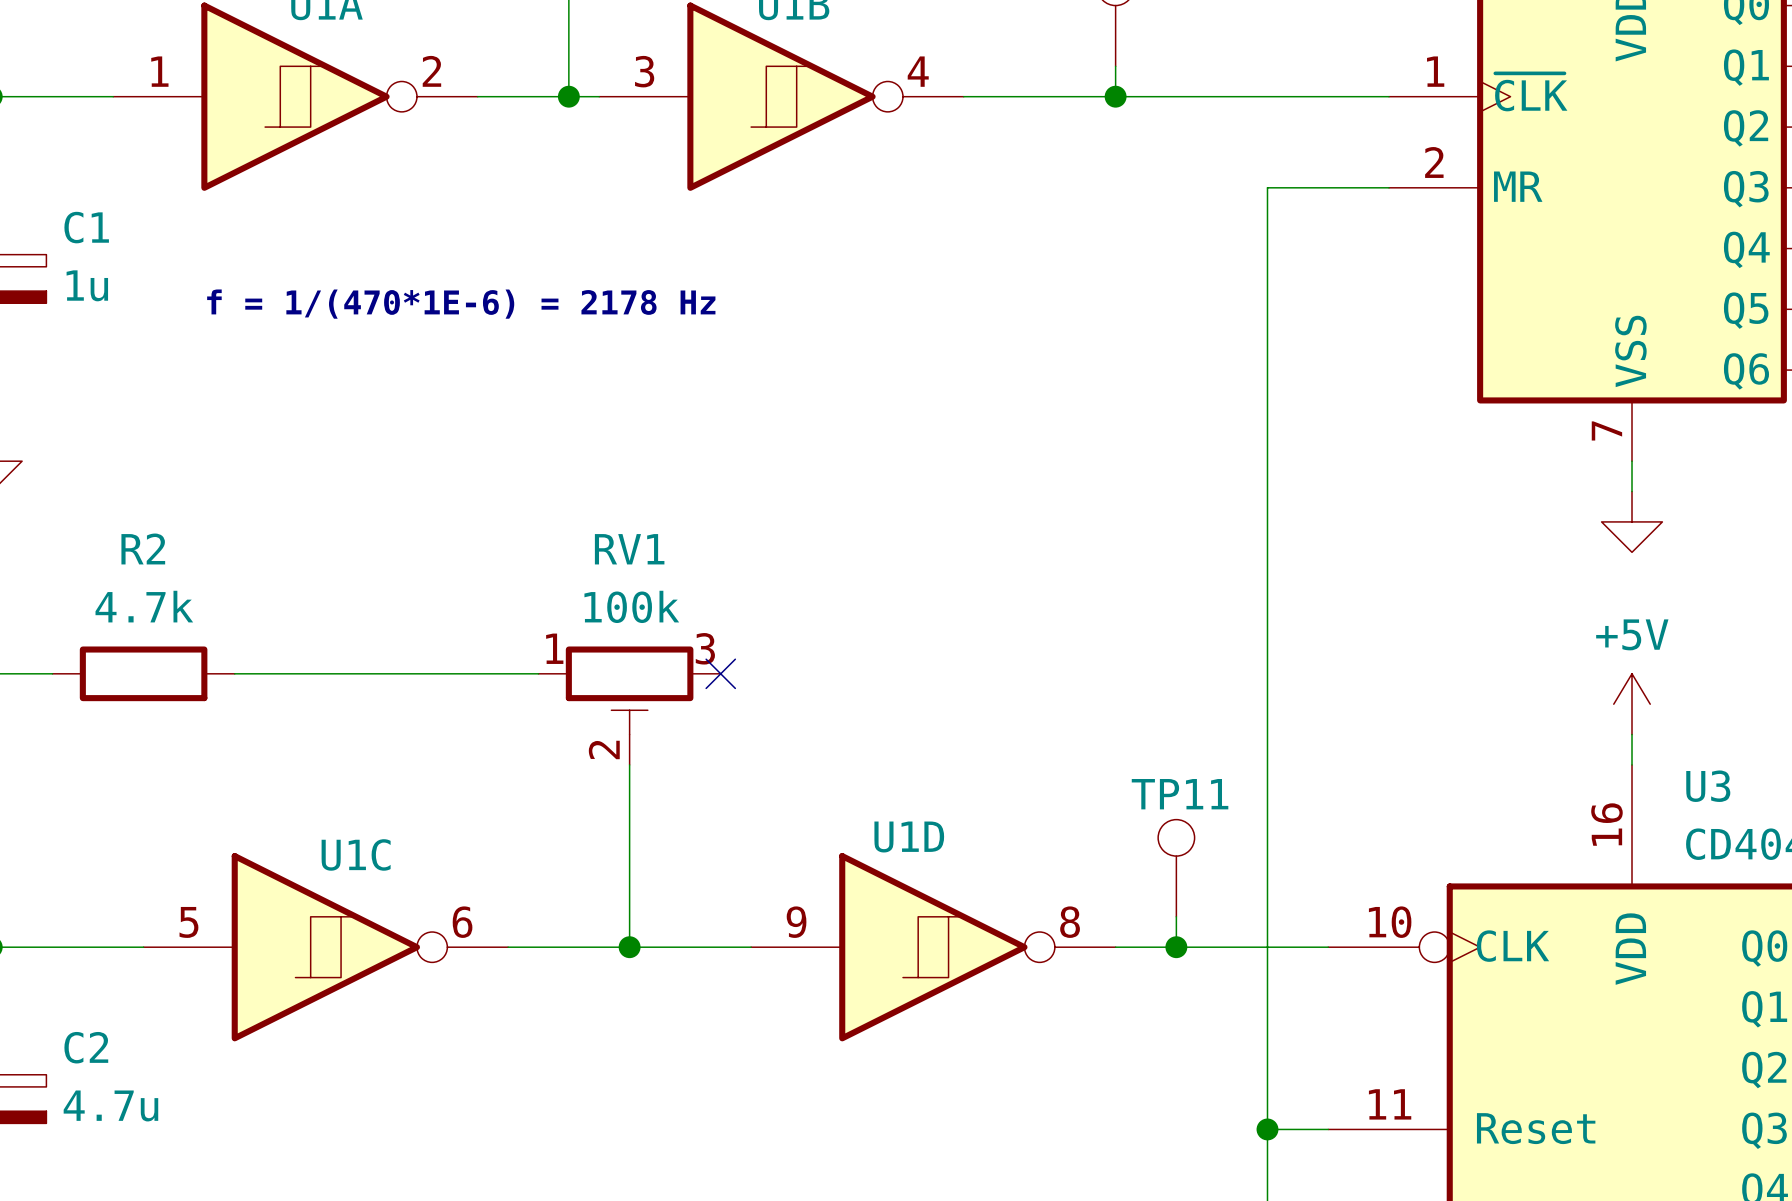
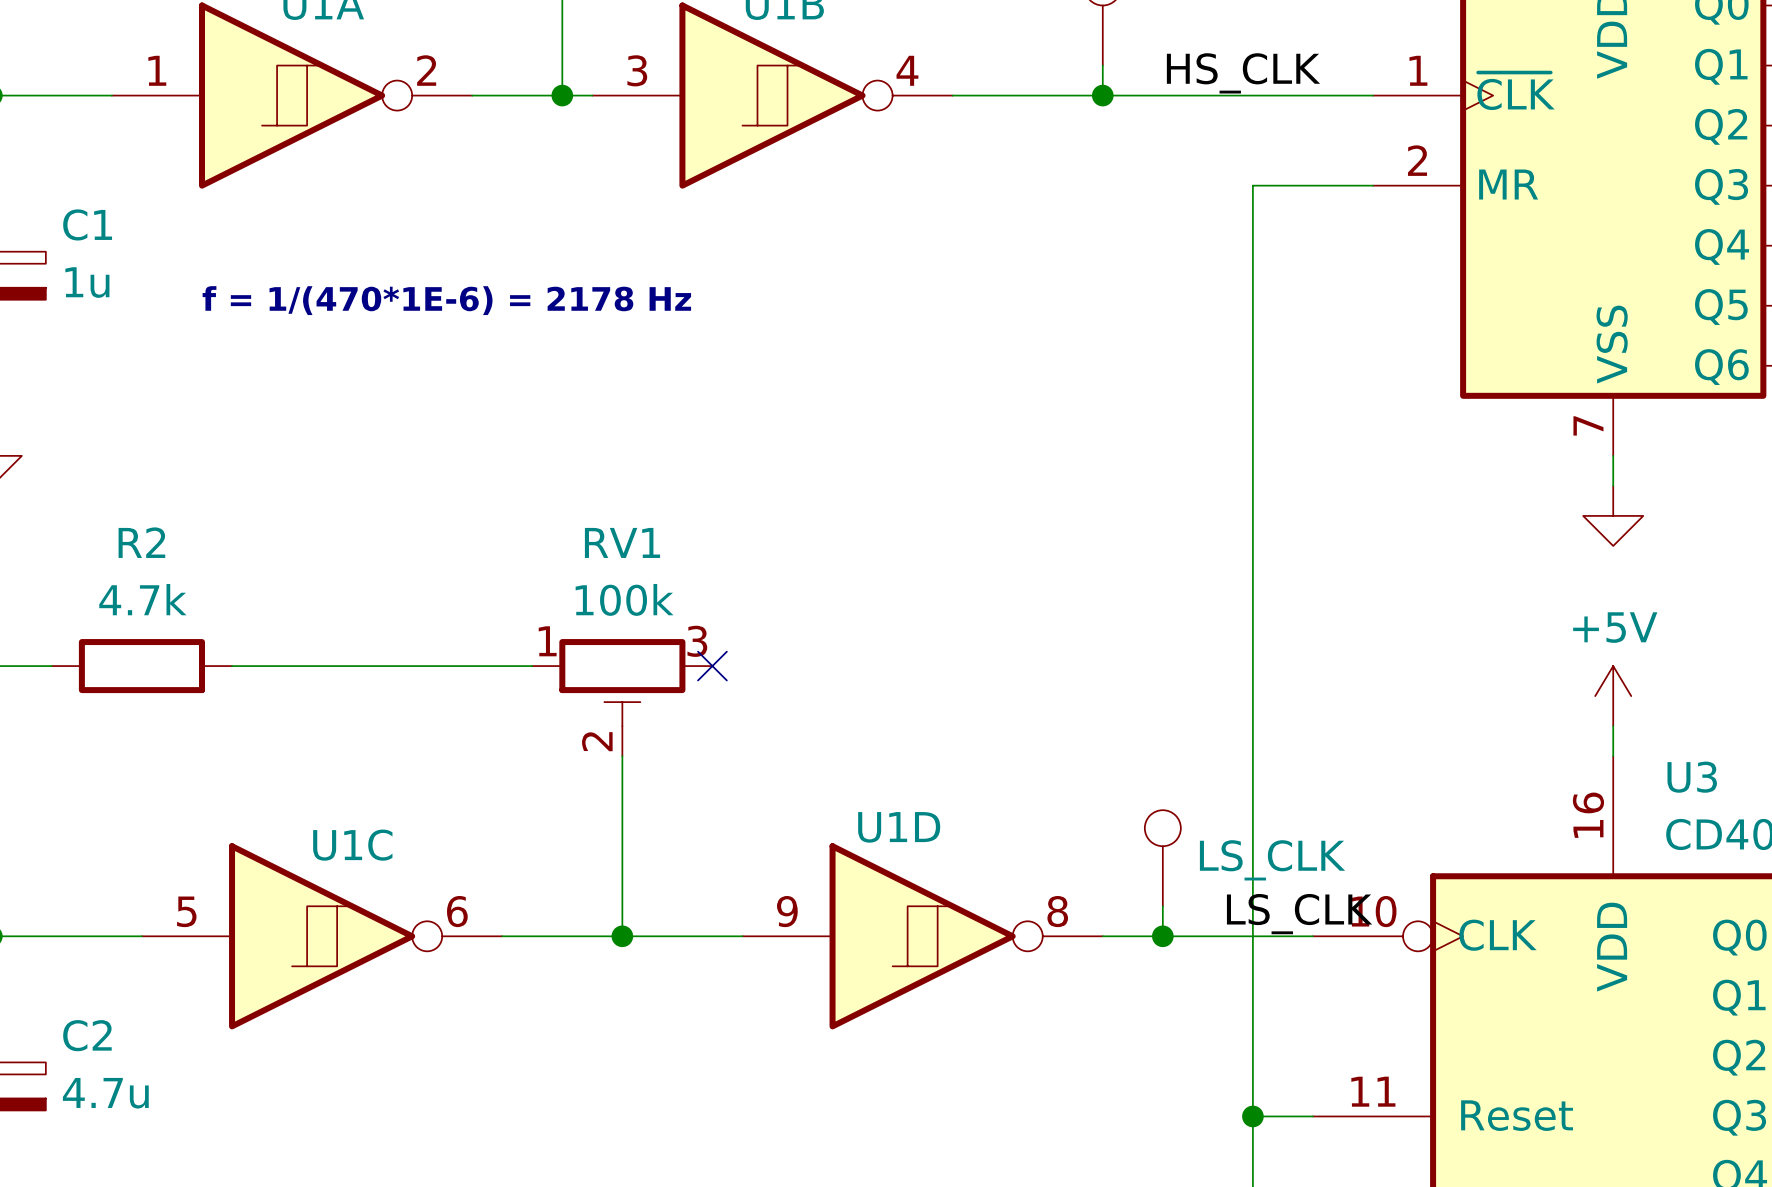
label: none -> HS_CLK (1243, 73)
TP11 name: TP11 (1180, 794) -> none
TP11 value: none -> LS_CLK (1272, 860)
label: none -> LS_CLK (1299, 914)

